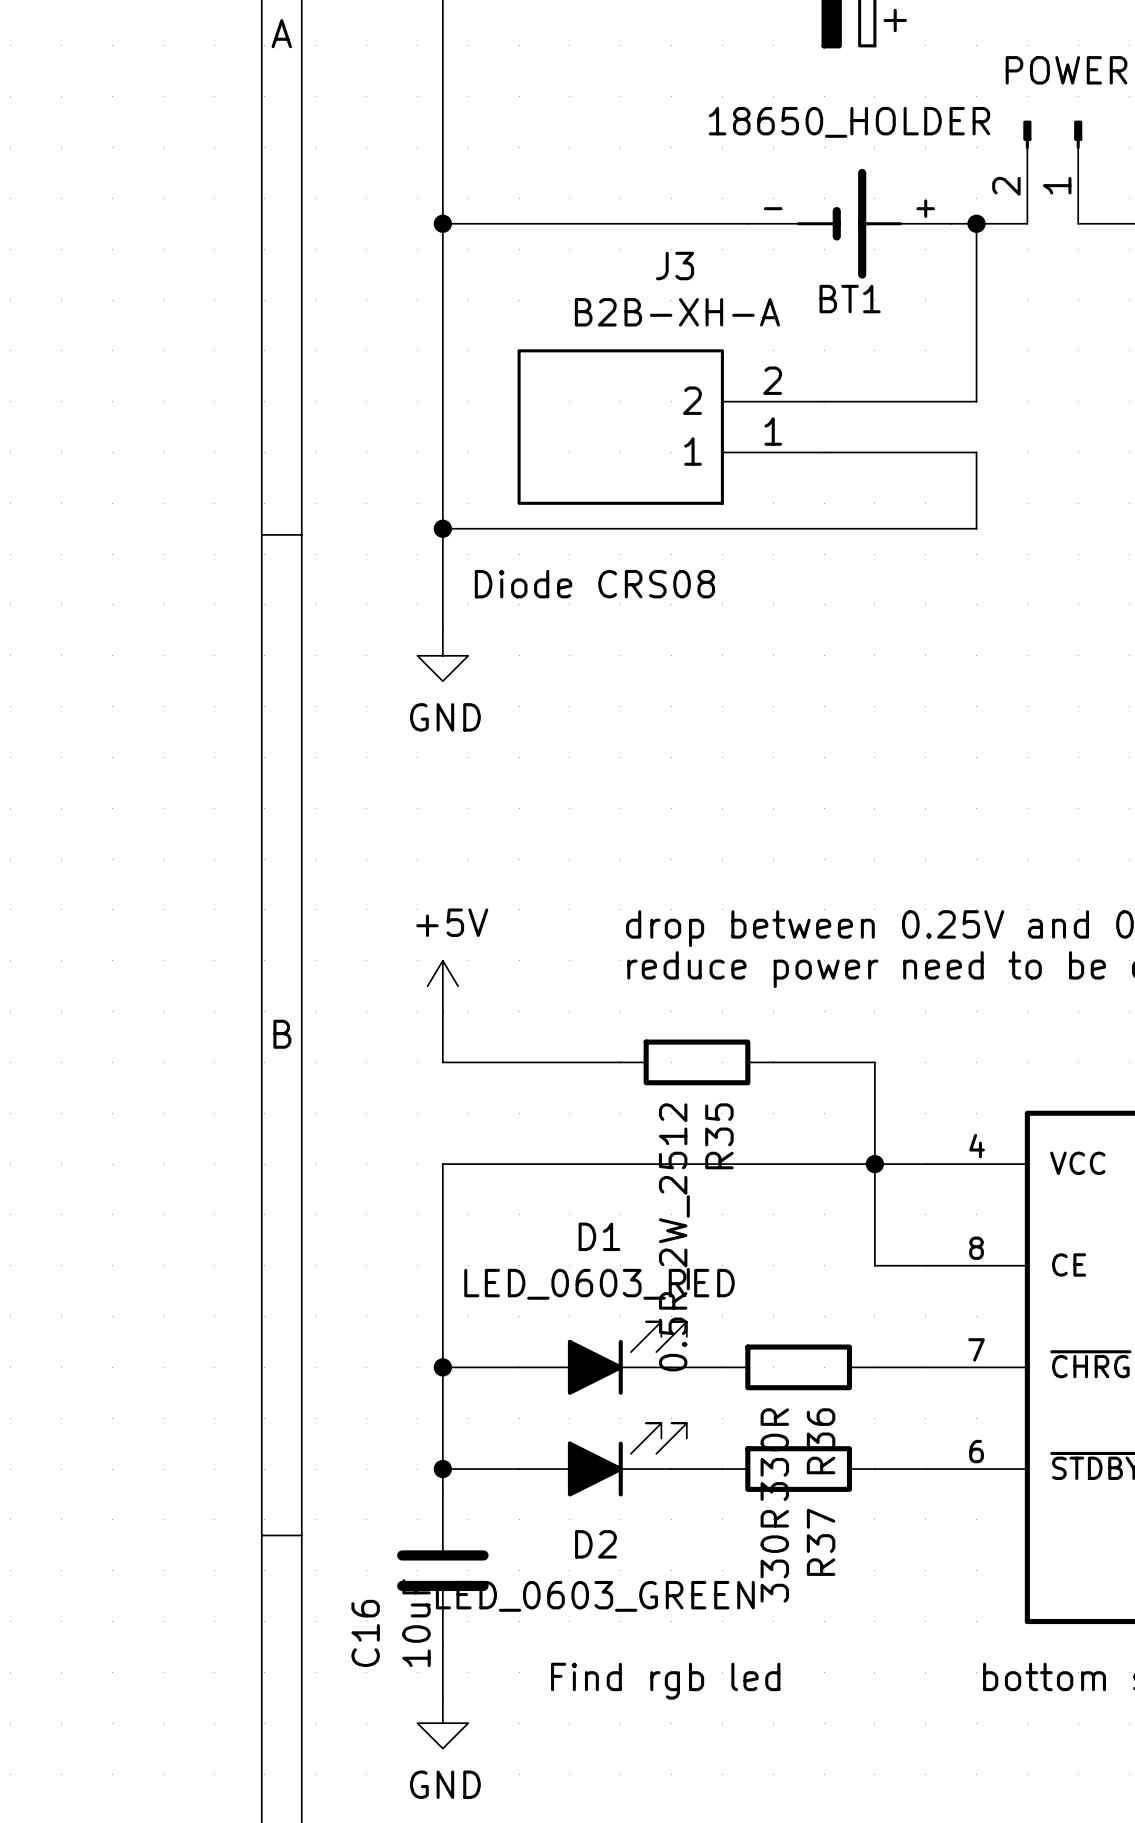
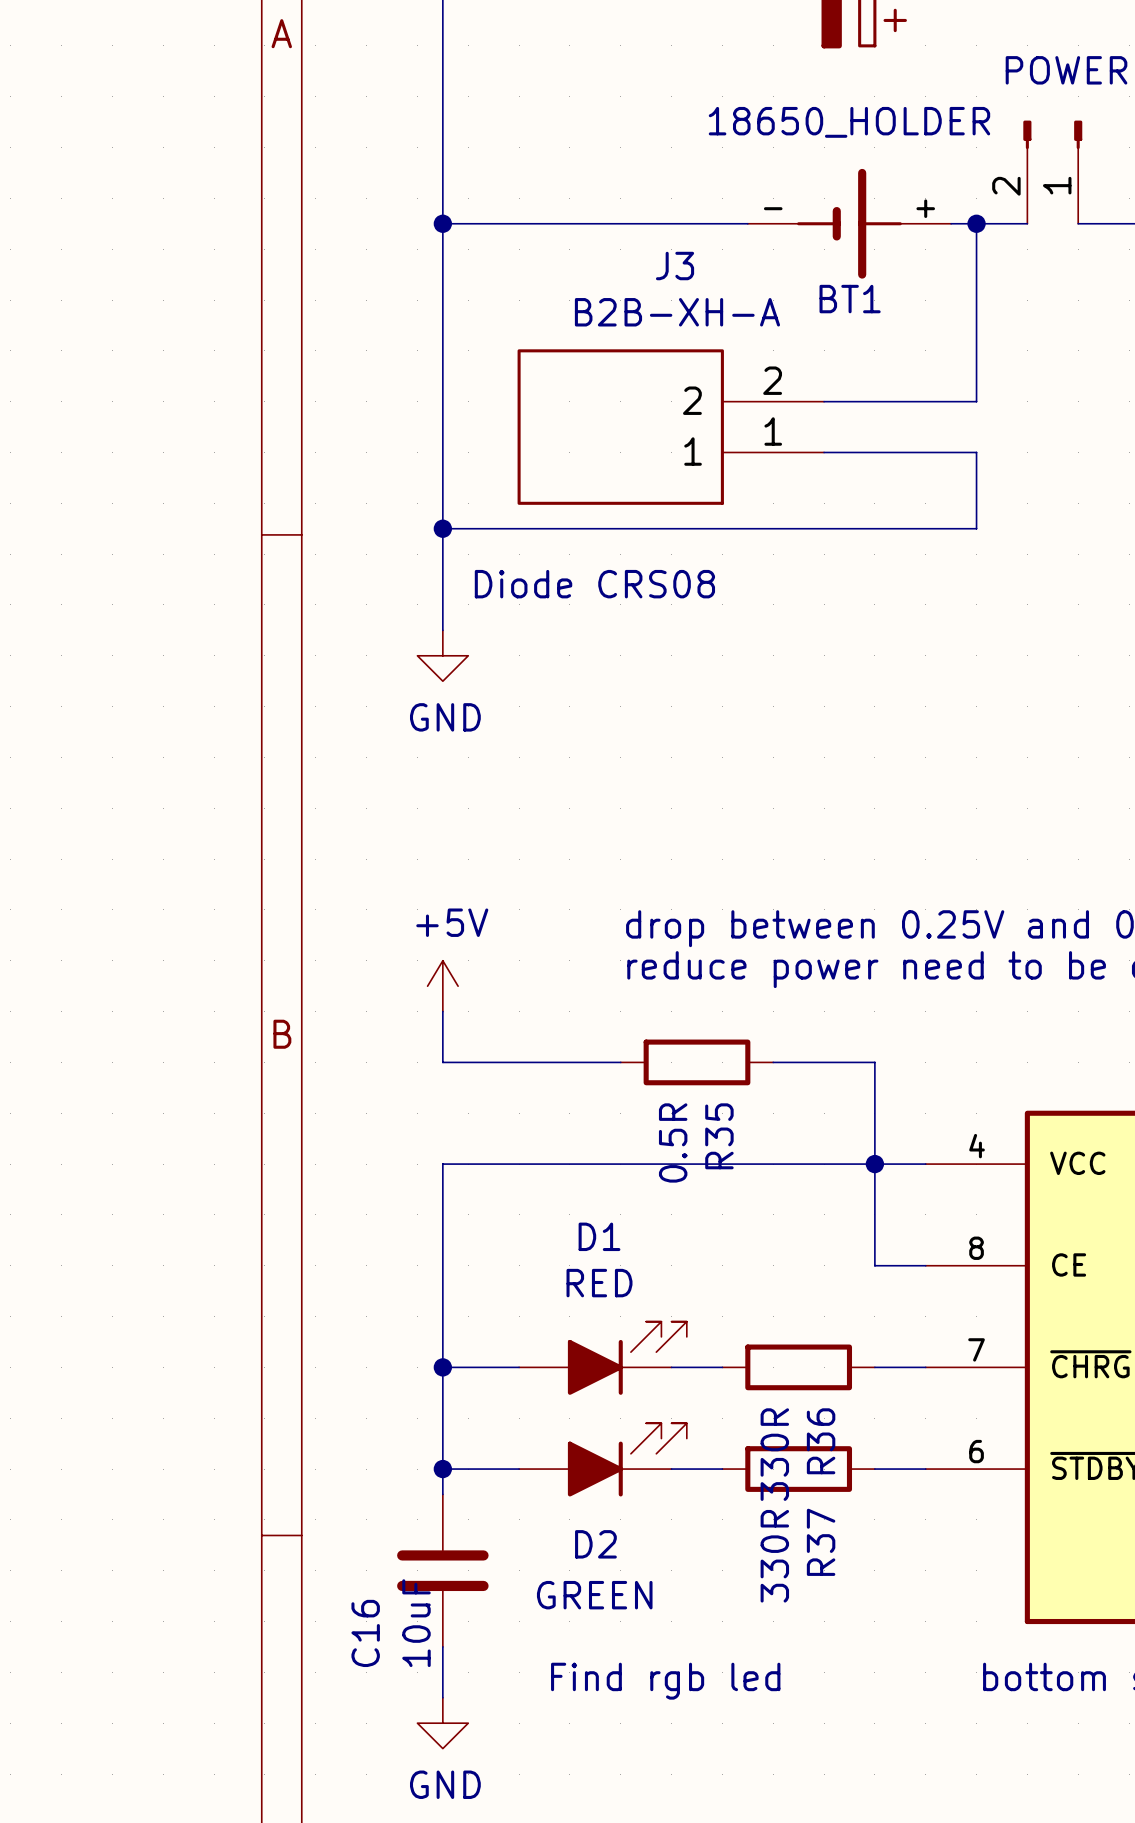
R35 value: 0.5R_2W_2512 (674, 1237) -> 0.5R (673, 1142)
D1 value: LED_0603_RED (599, 1284) -> RED (599, 1283)
D2 value: LED_0603_GREEN (595, 1596) -> GREEN (594, 1595)

